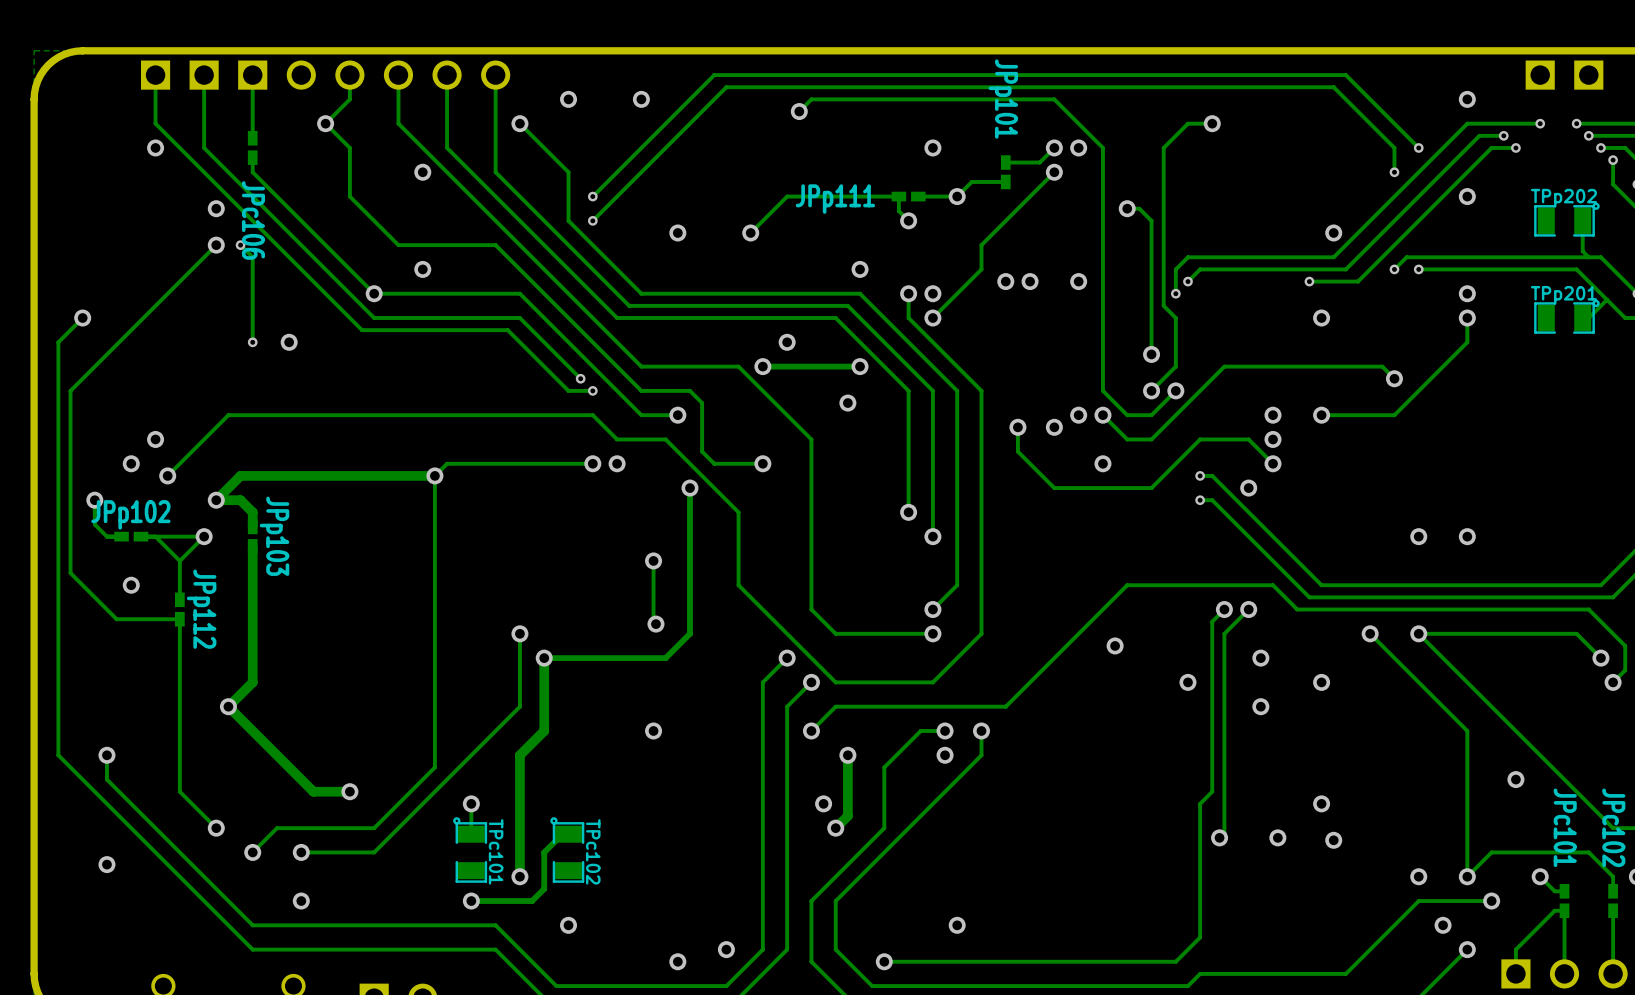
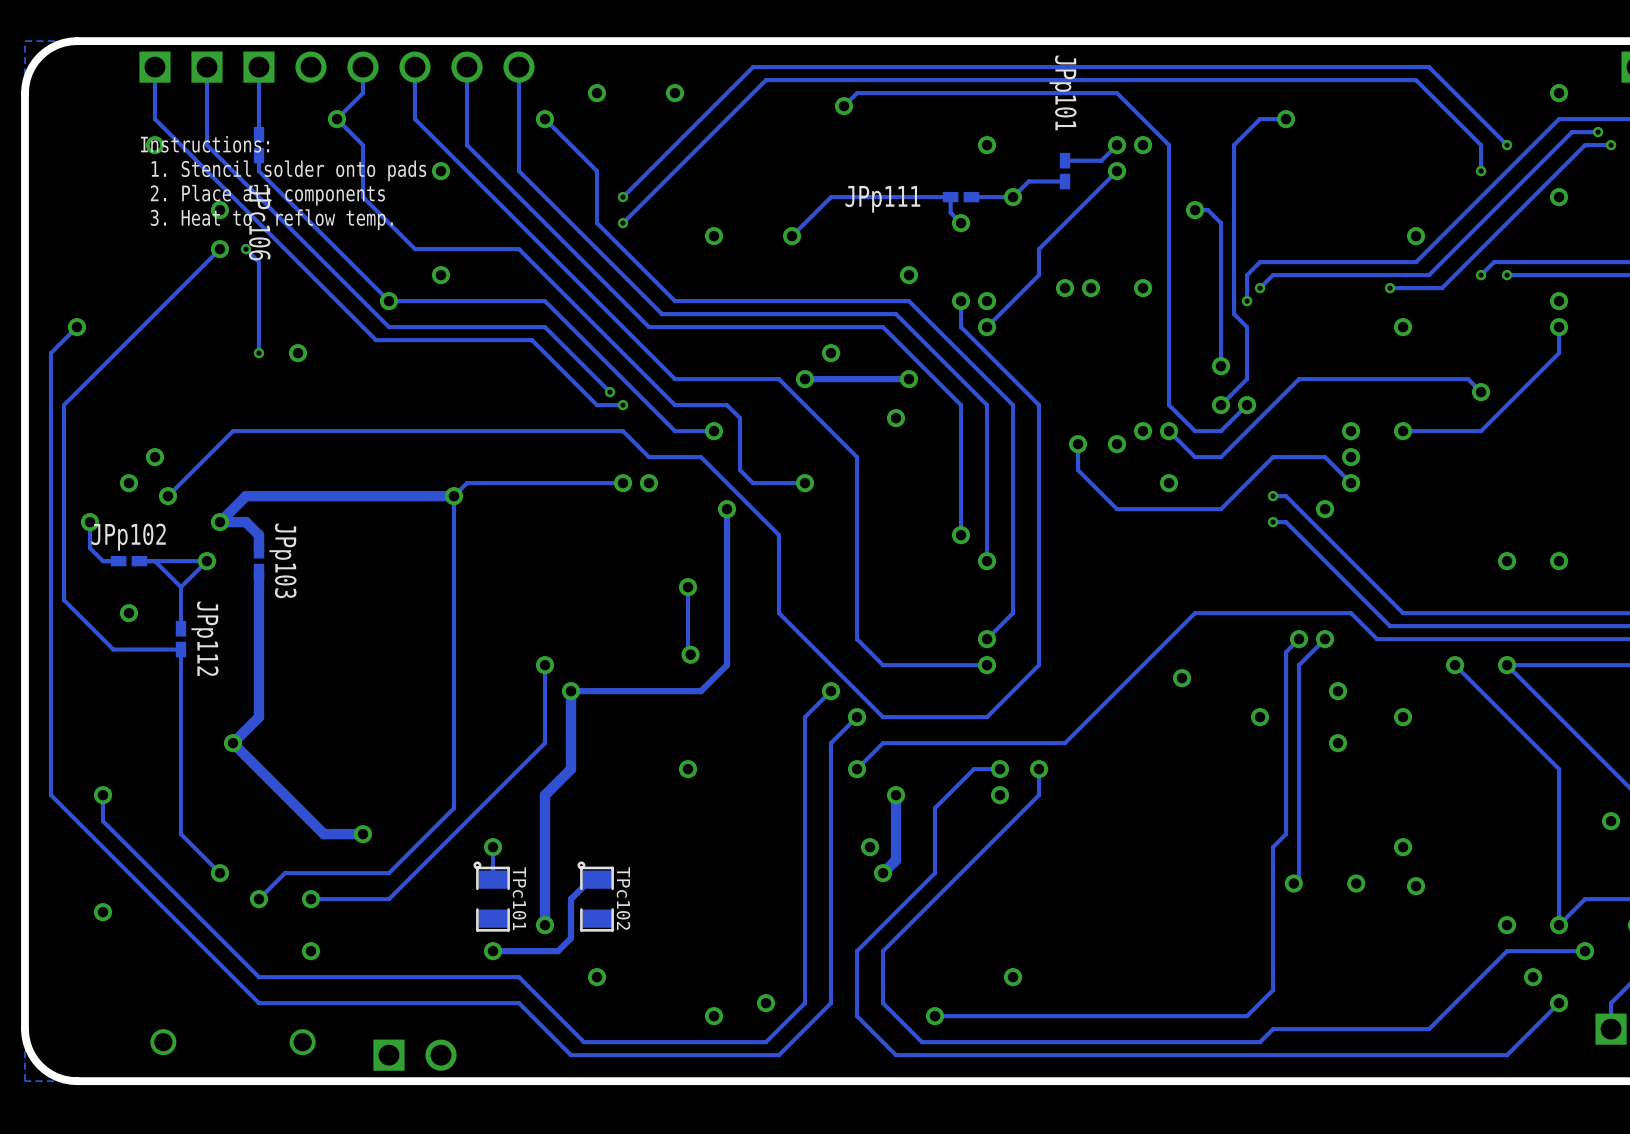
text: none -> Instructions: (205, 144)
text: none -> 1. Stencil solder onto pads (288, 170)
text: none -> 2. Place all components (267, 195)
text: none -> 3. Heat to reflow temp. (271, 219)

